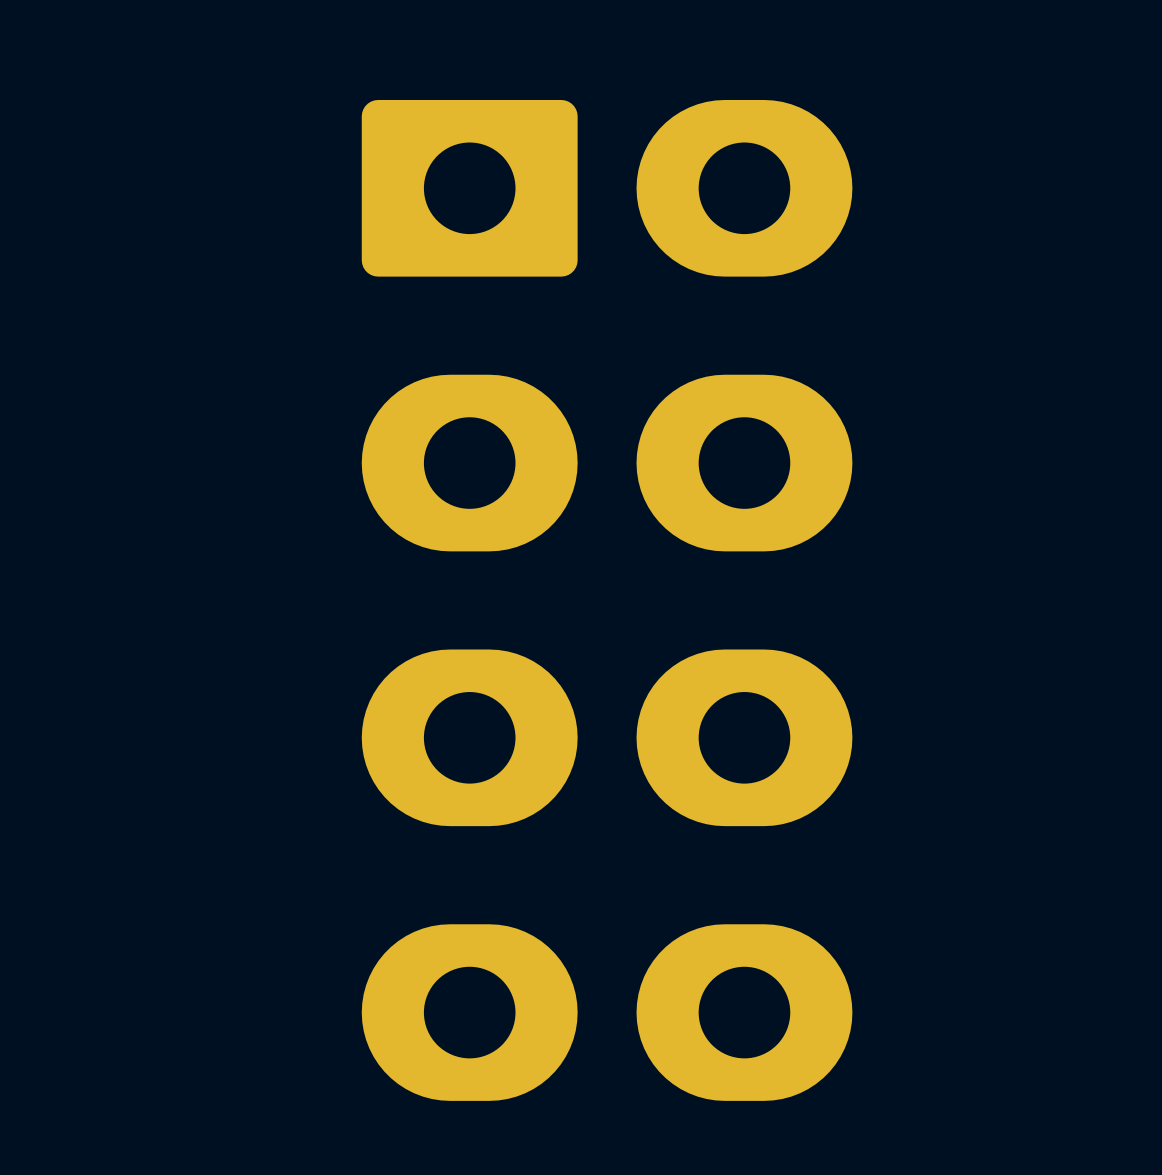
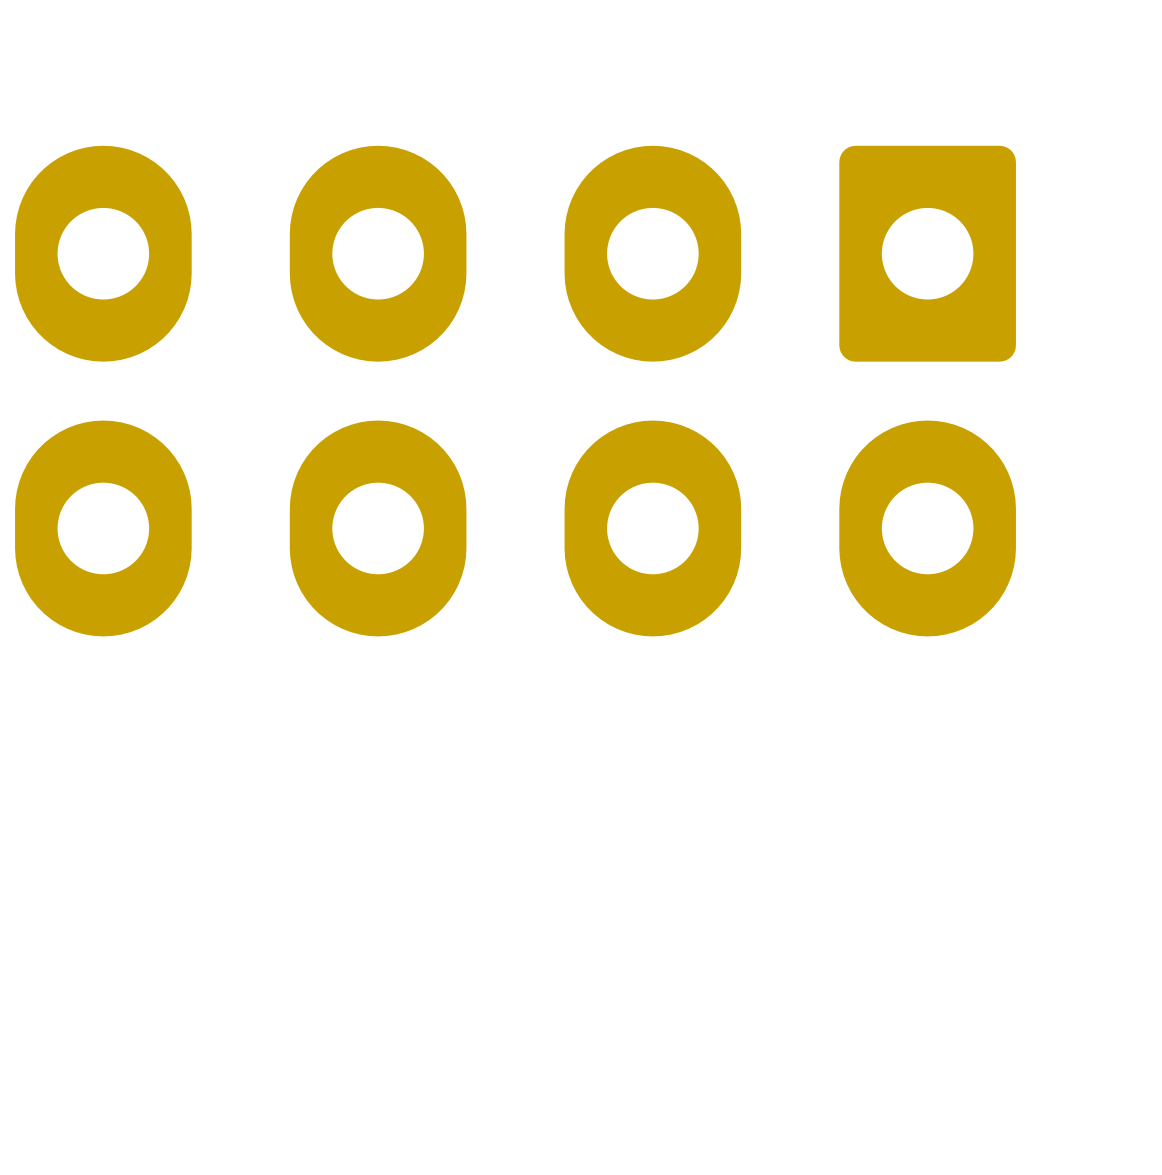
part rotation: 0° (607, 600) -> 90° clockwise (515, 391)

